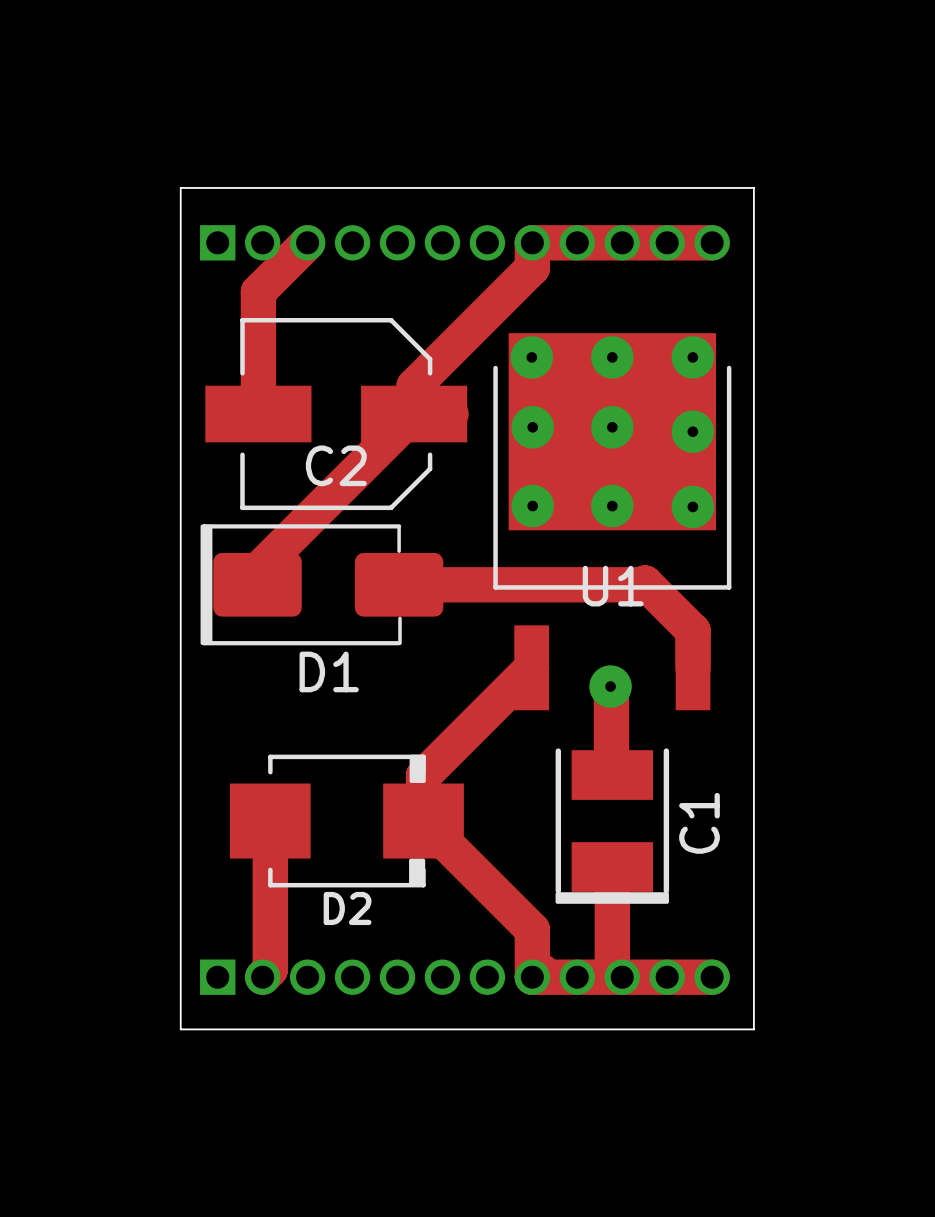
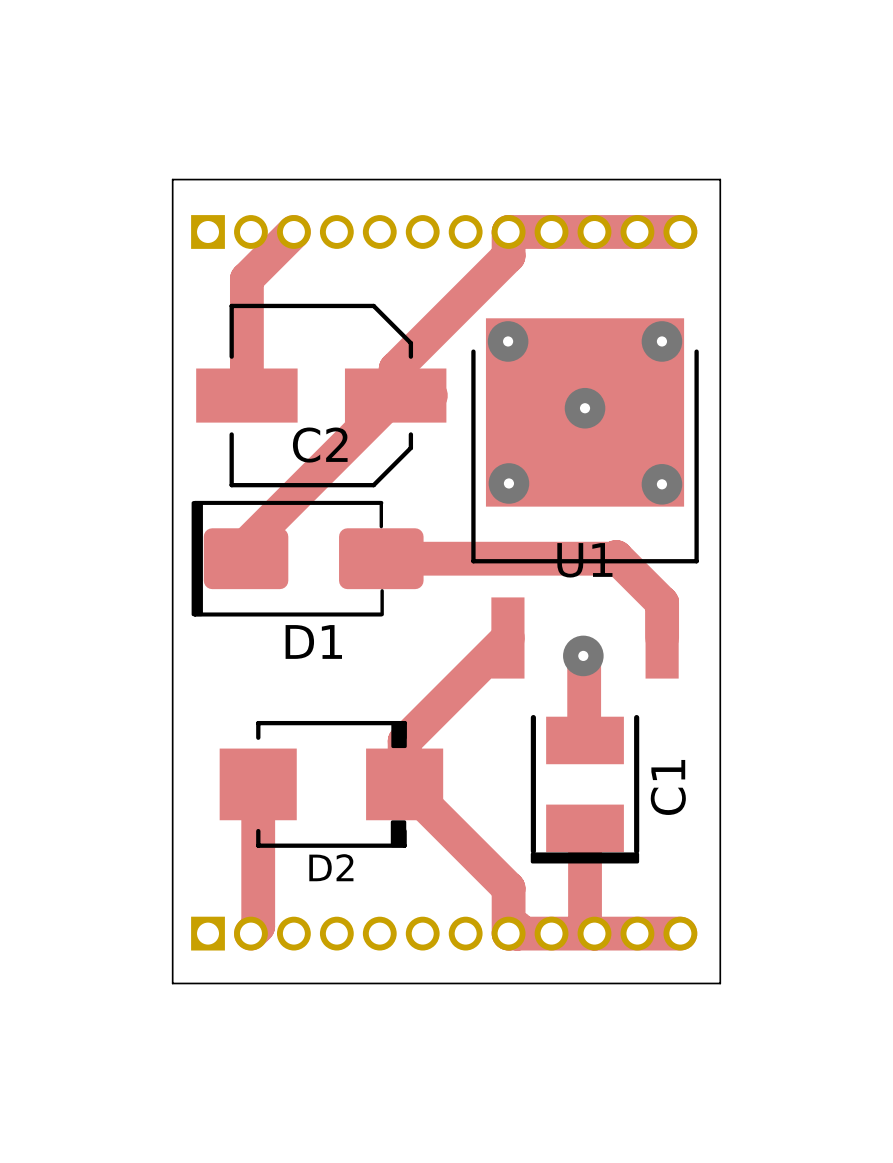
via: (612, 357) -> none
via: (532, 427) -> none
via: (692, 431) -> none
via: (612, 506) -> none

